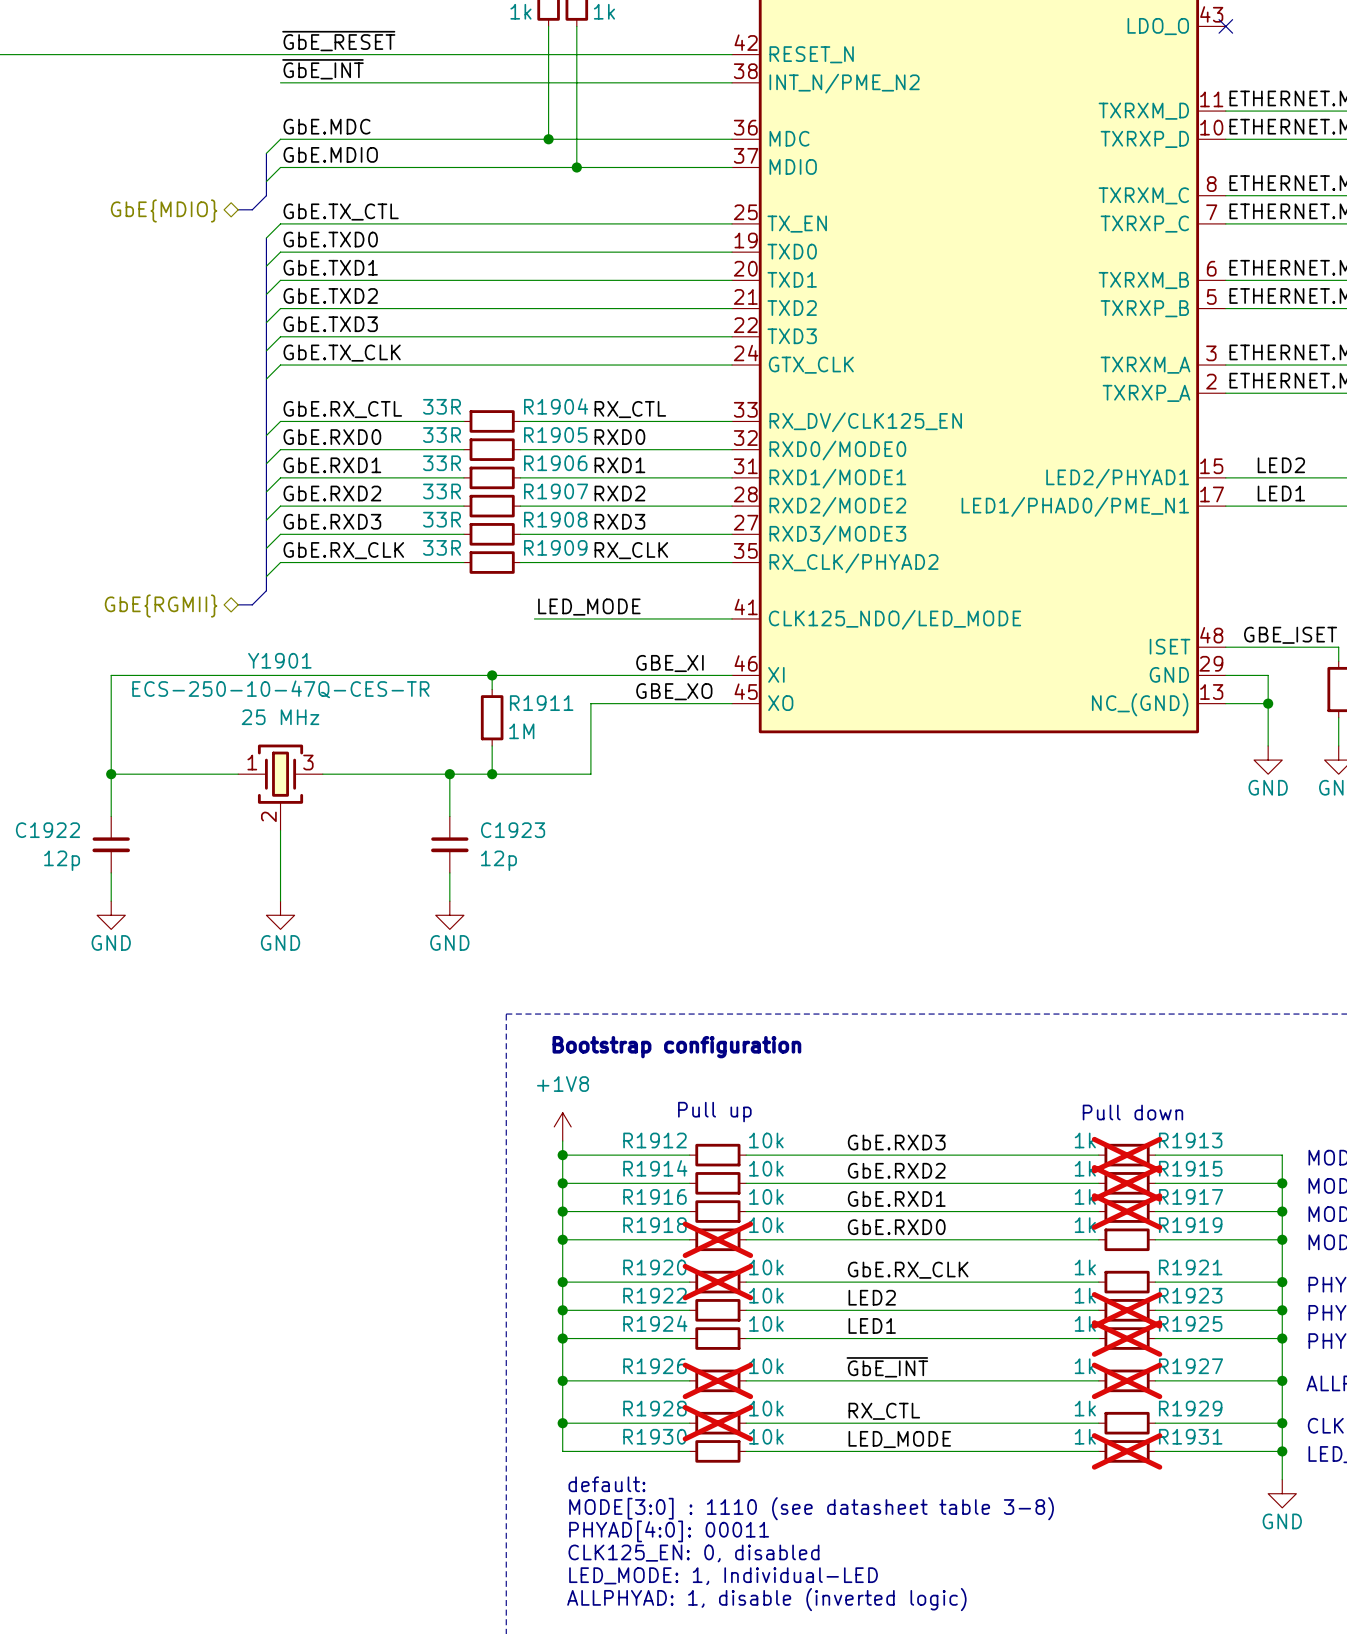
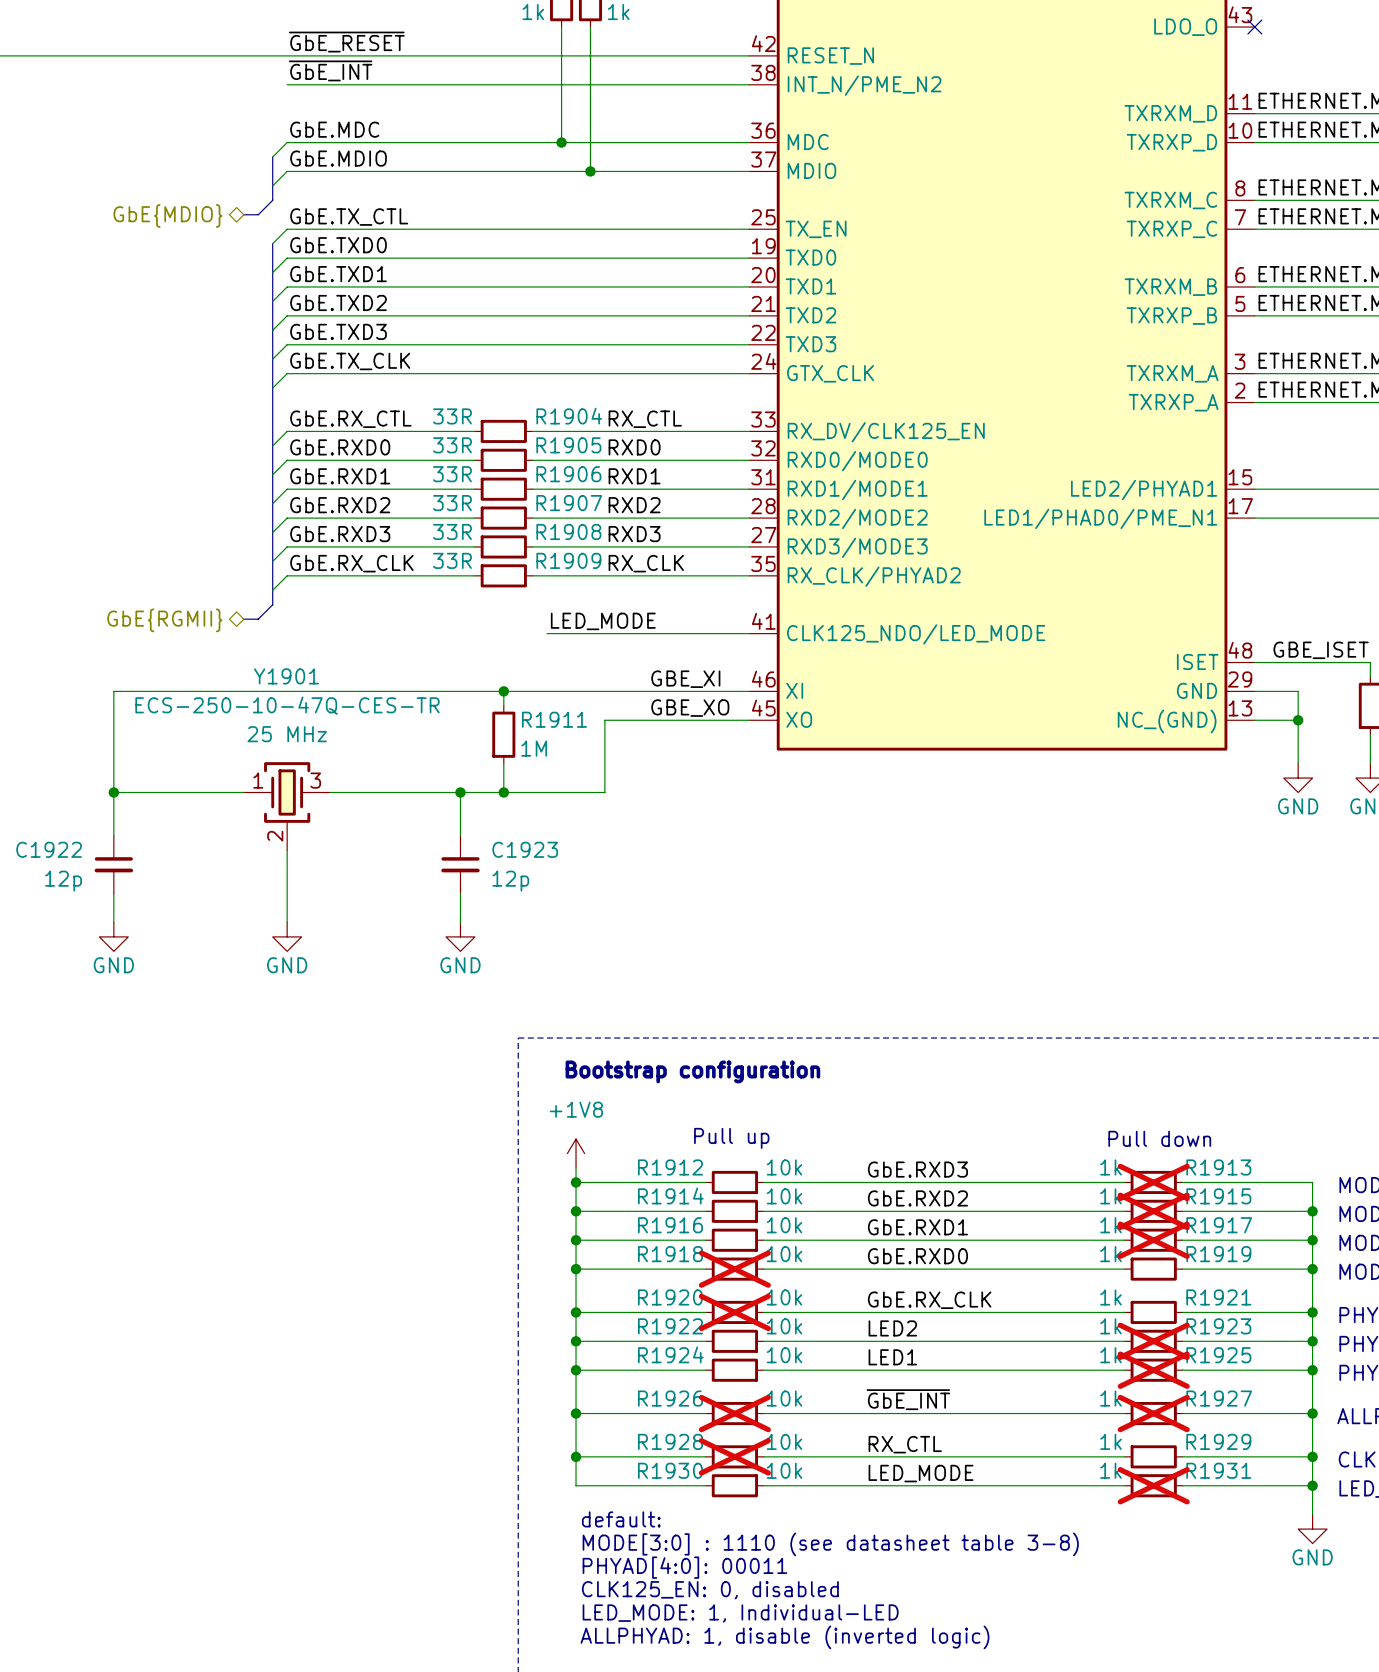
label: LED2 (1281, 465) -> none
label: LED1 (1281, 493) -> none

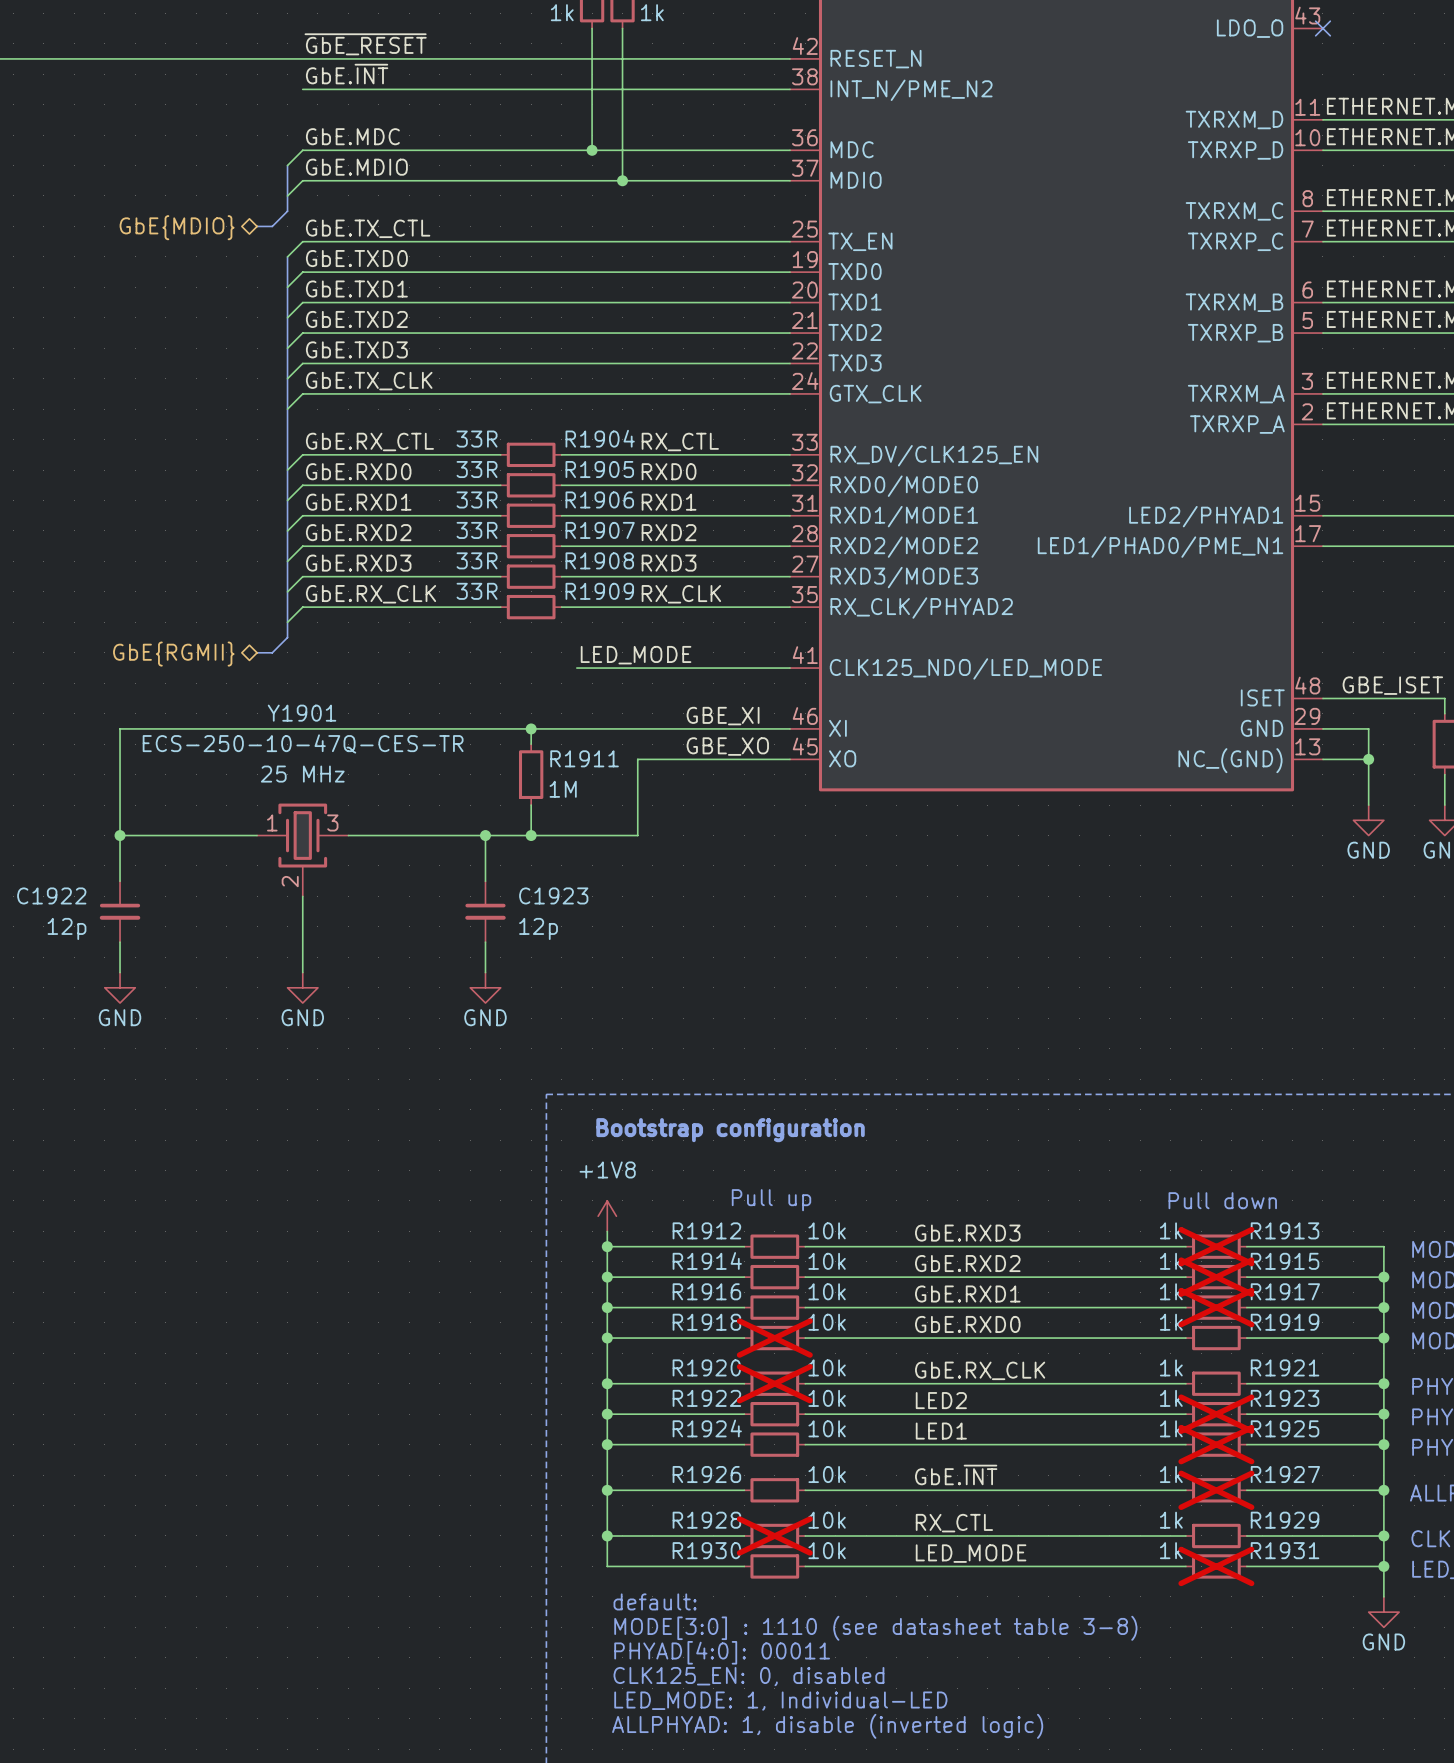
label: ~{GbE_INT} (330, 70) -> GbE.~{INT} (347, 74)
label: ~{GbE_INT} (908, 1399) -> GbE.~{INT} (956, 1474)
R1926 do-not-place cross: (734, 1413) -> none

